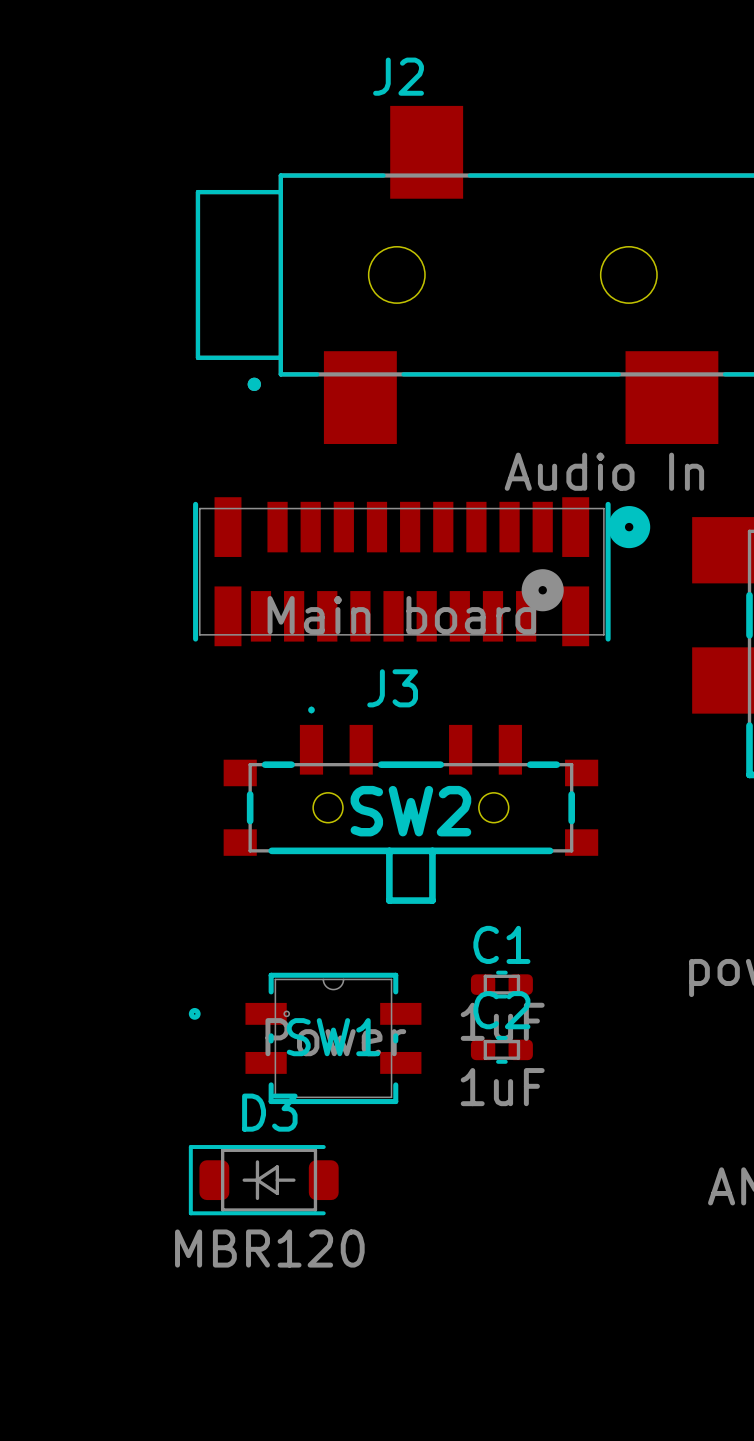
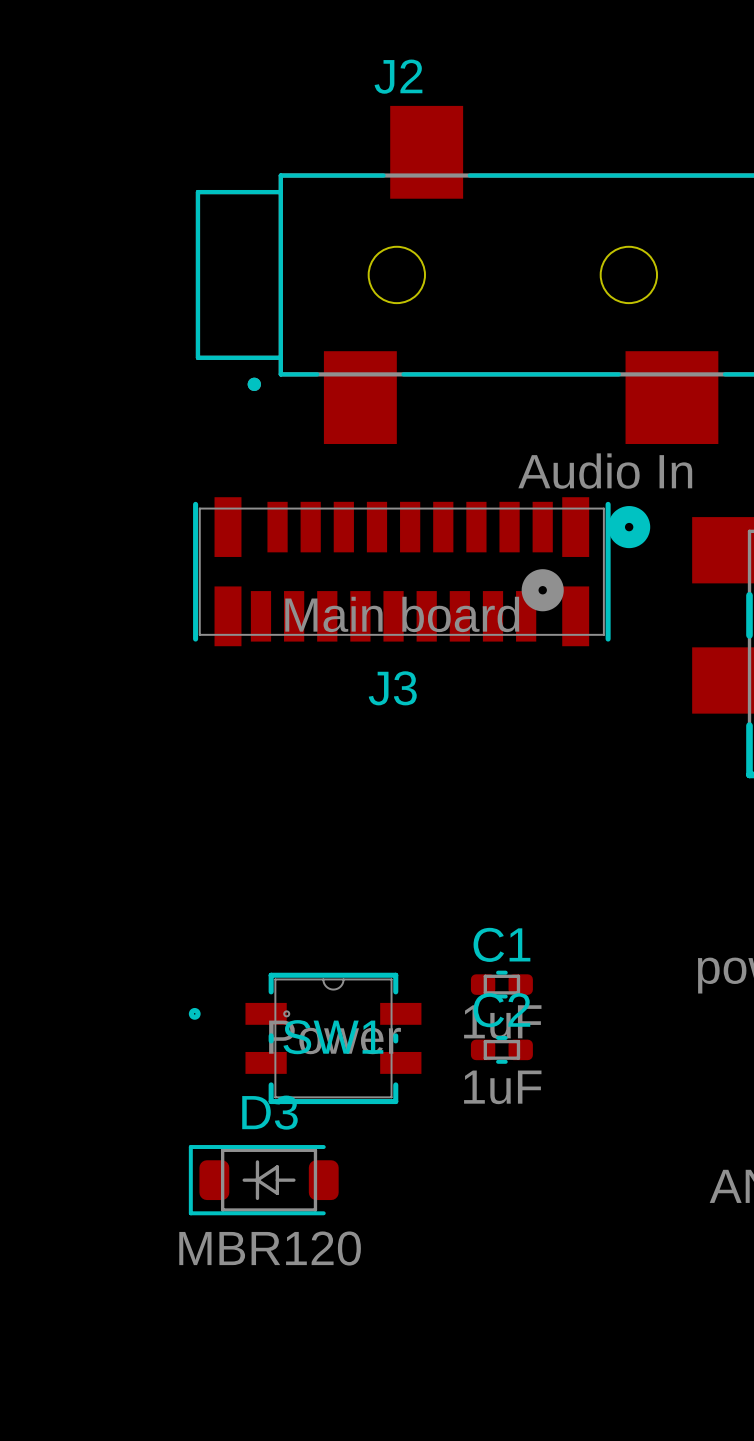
SW2: (410, 805) -> none

